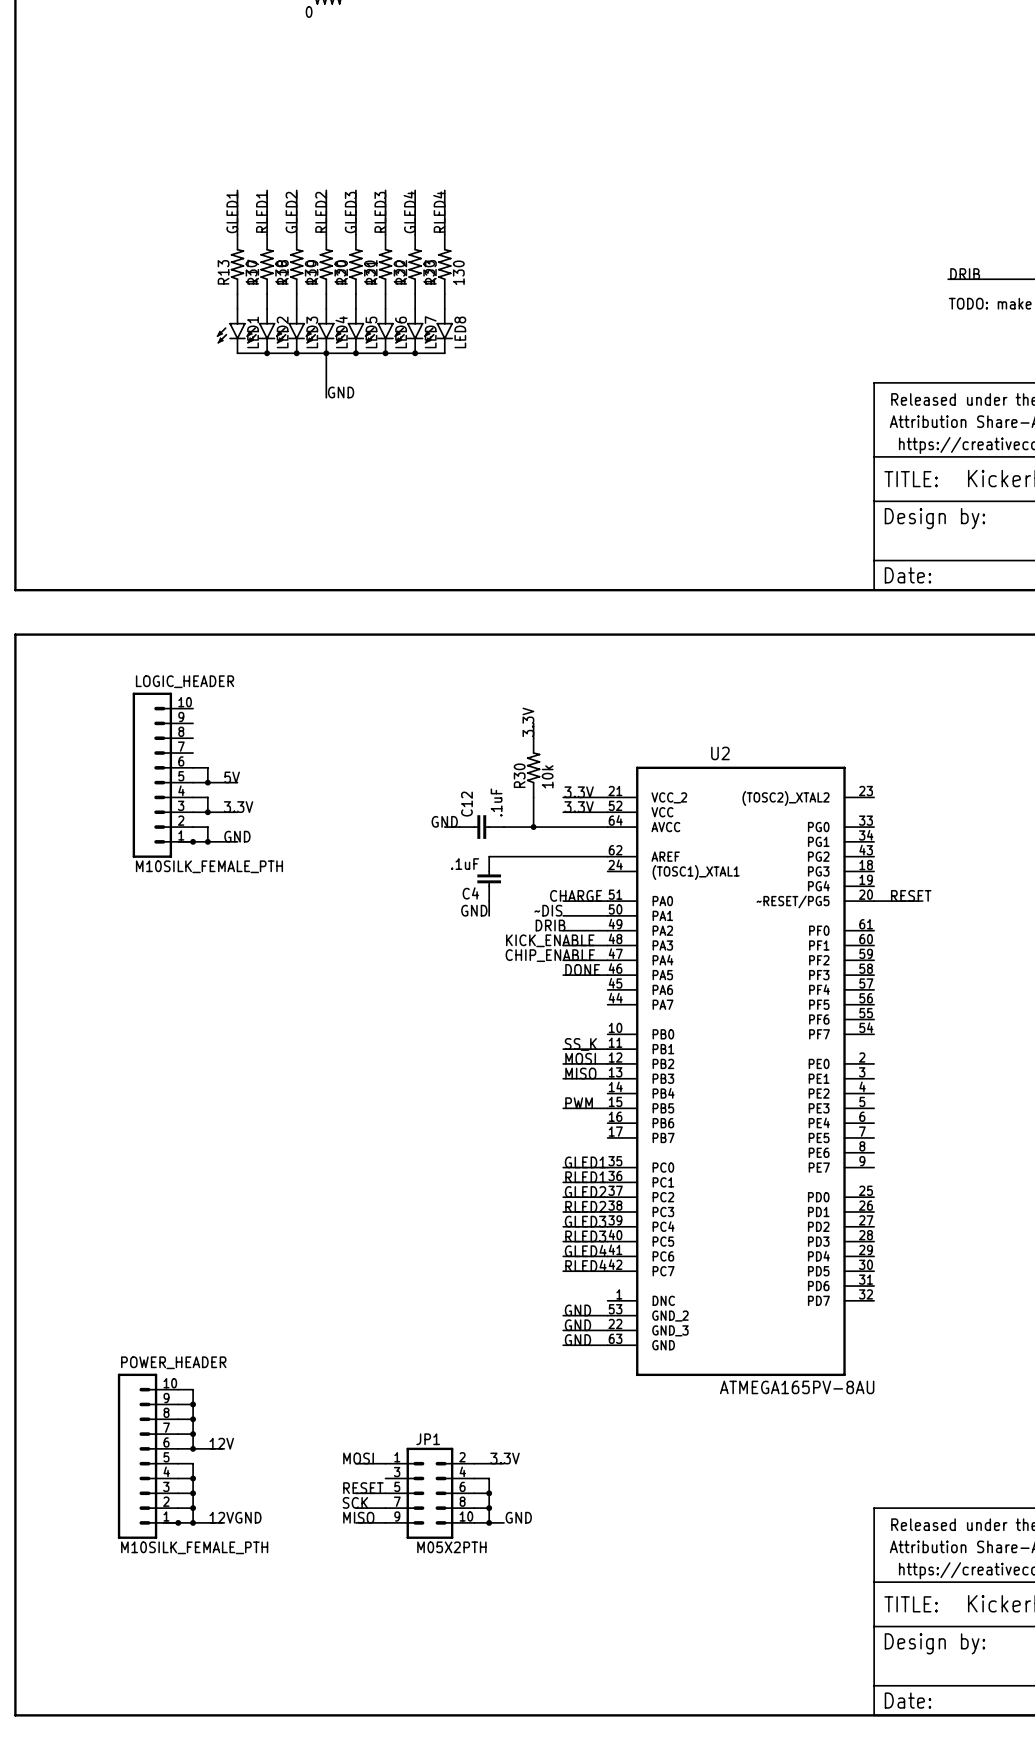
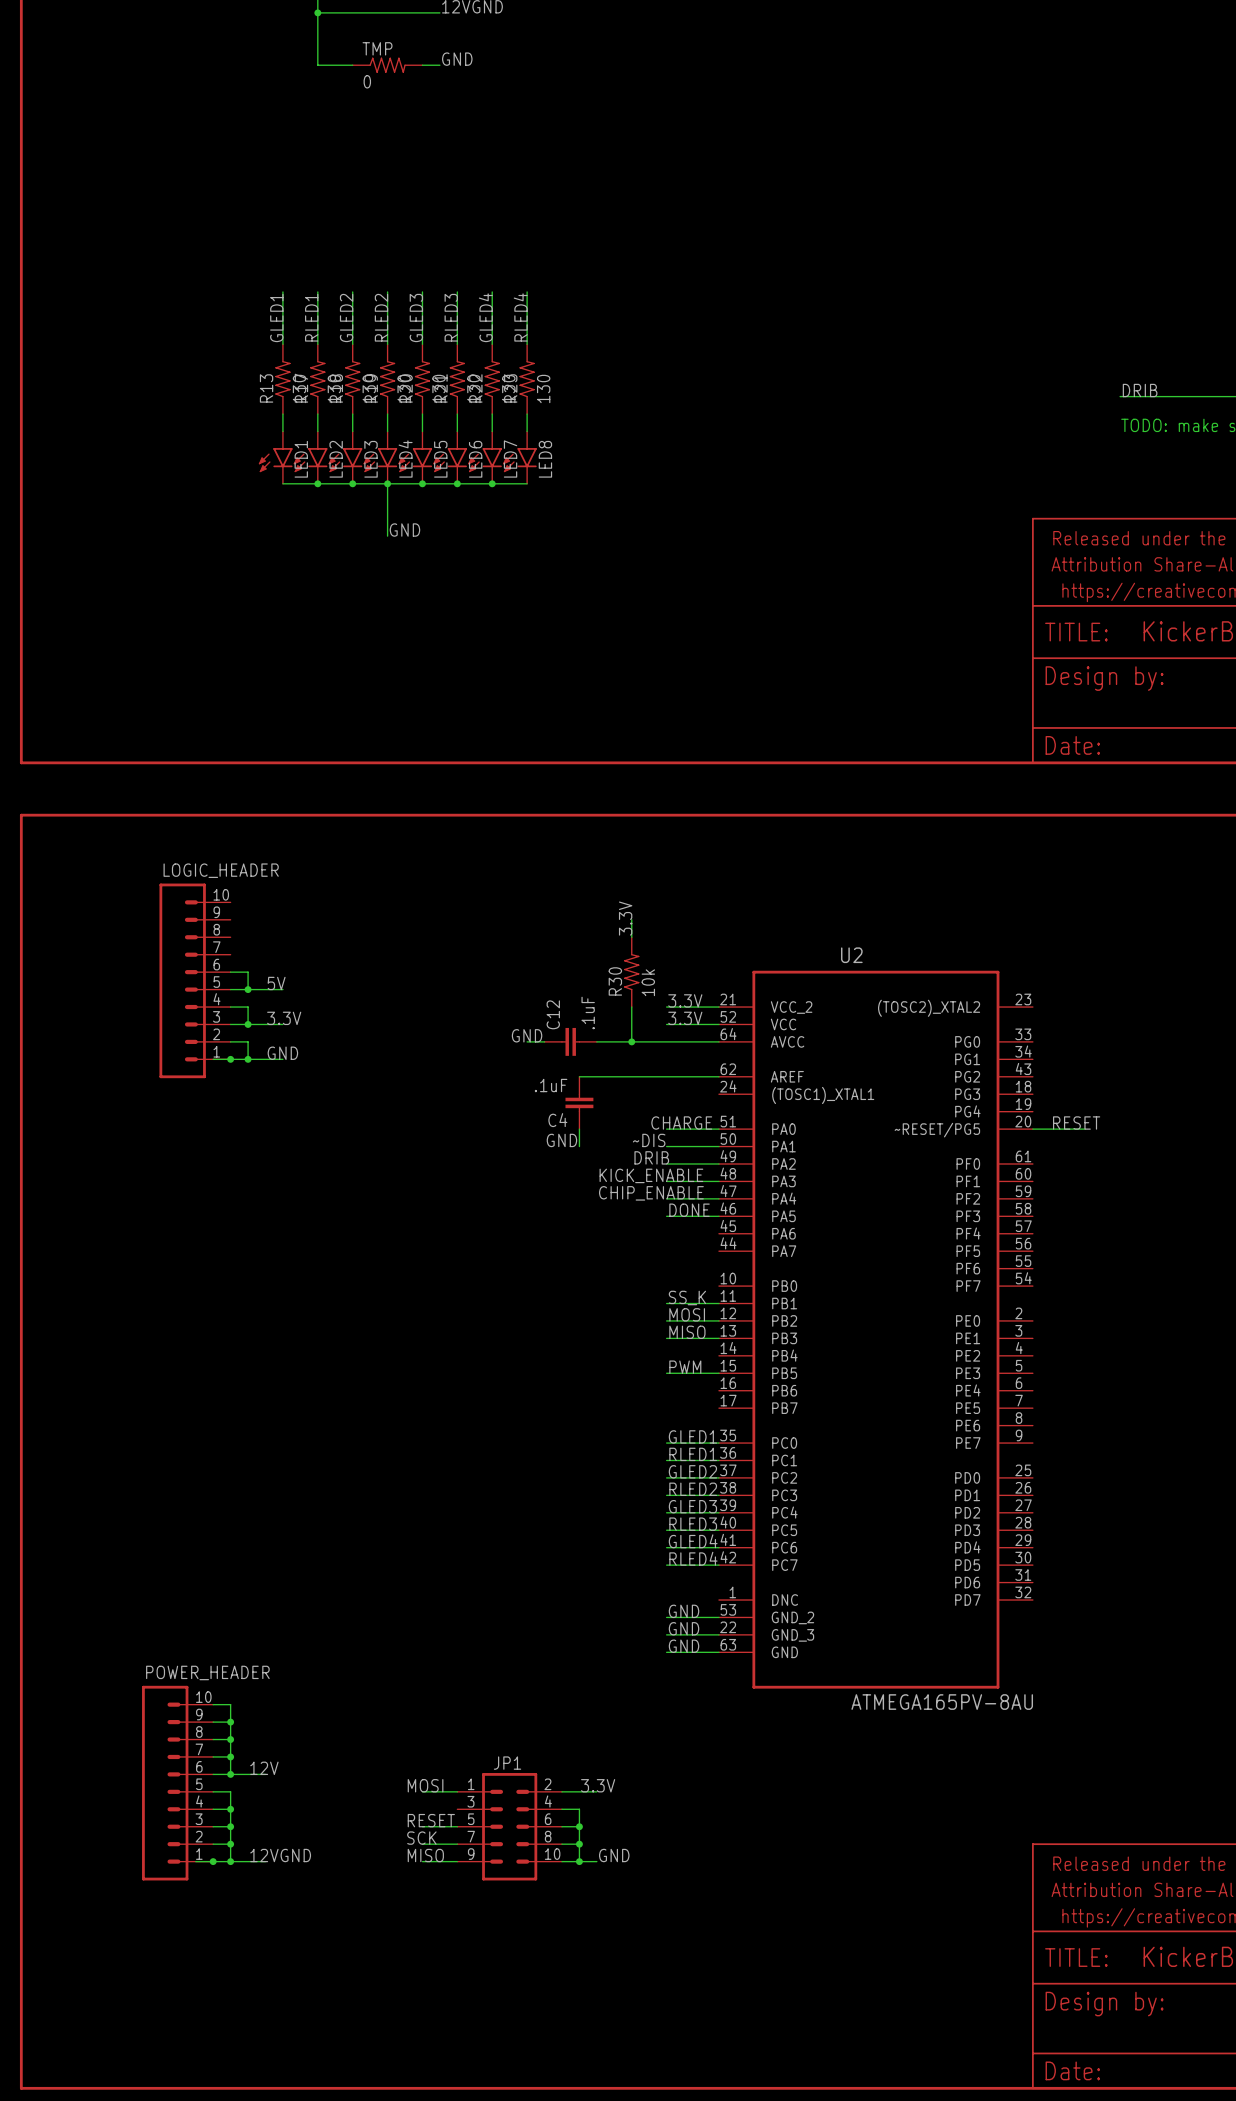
LOGIC_HEADER value: M10SILK_FEMALE_PTH (209, 866) -> none
POWER_HEADER value: M10SILK_FEMALE_PTH (194, 1547) -> none
JP1 value: M05X2PTH (451, 1547) -> none

